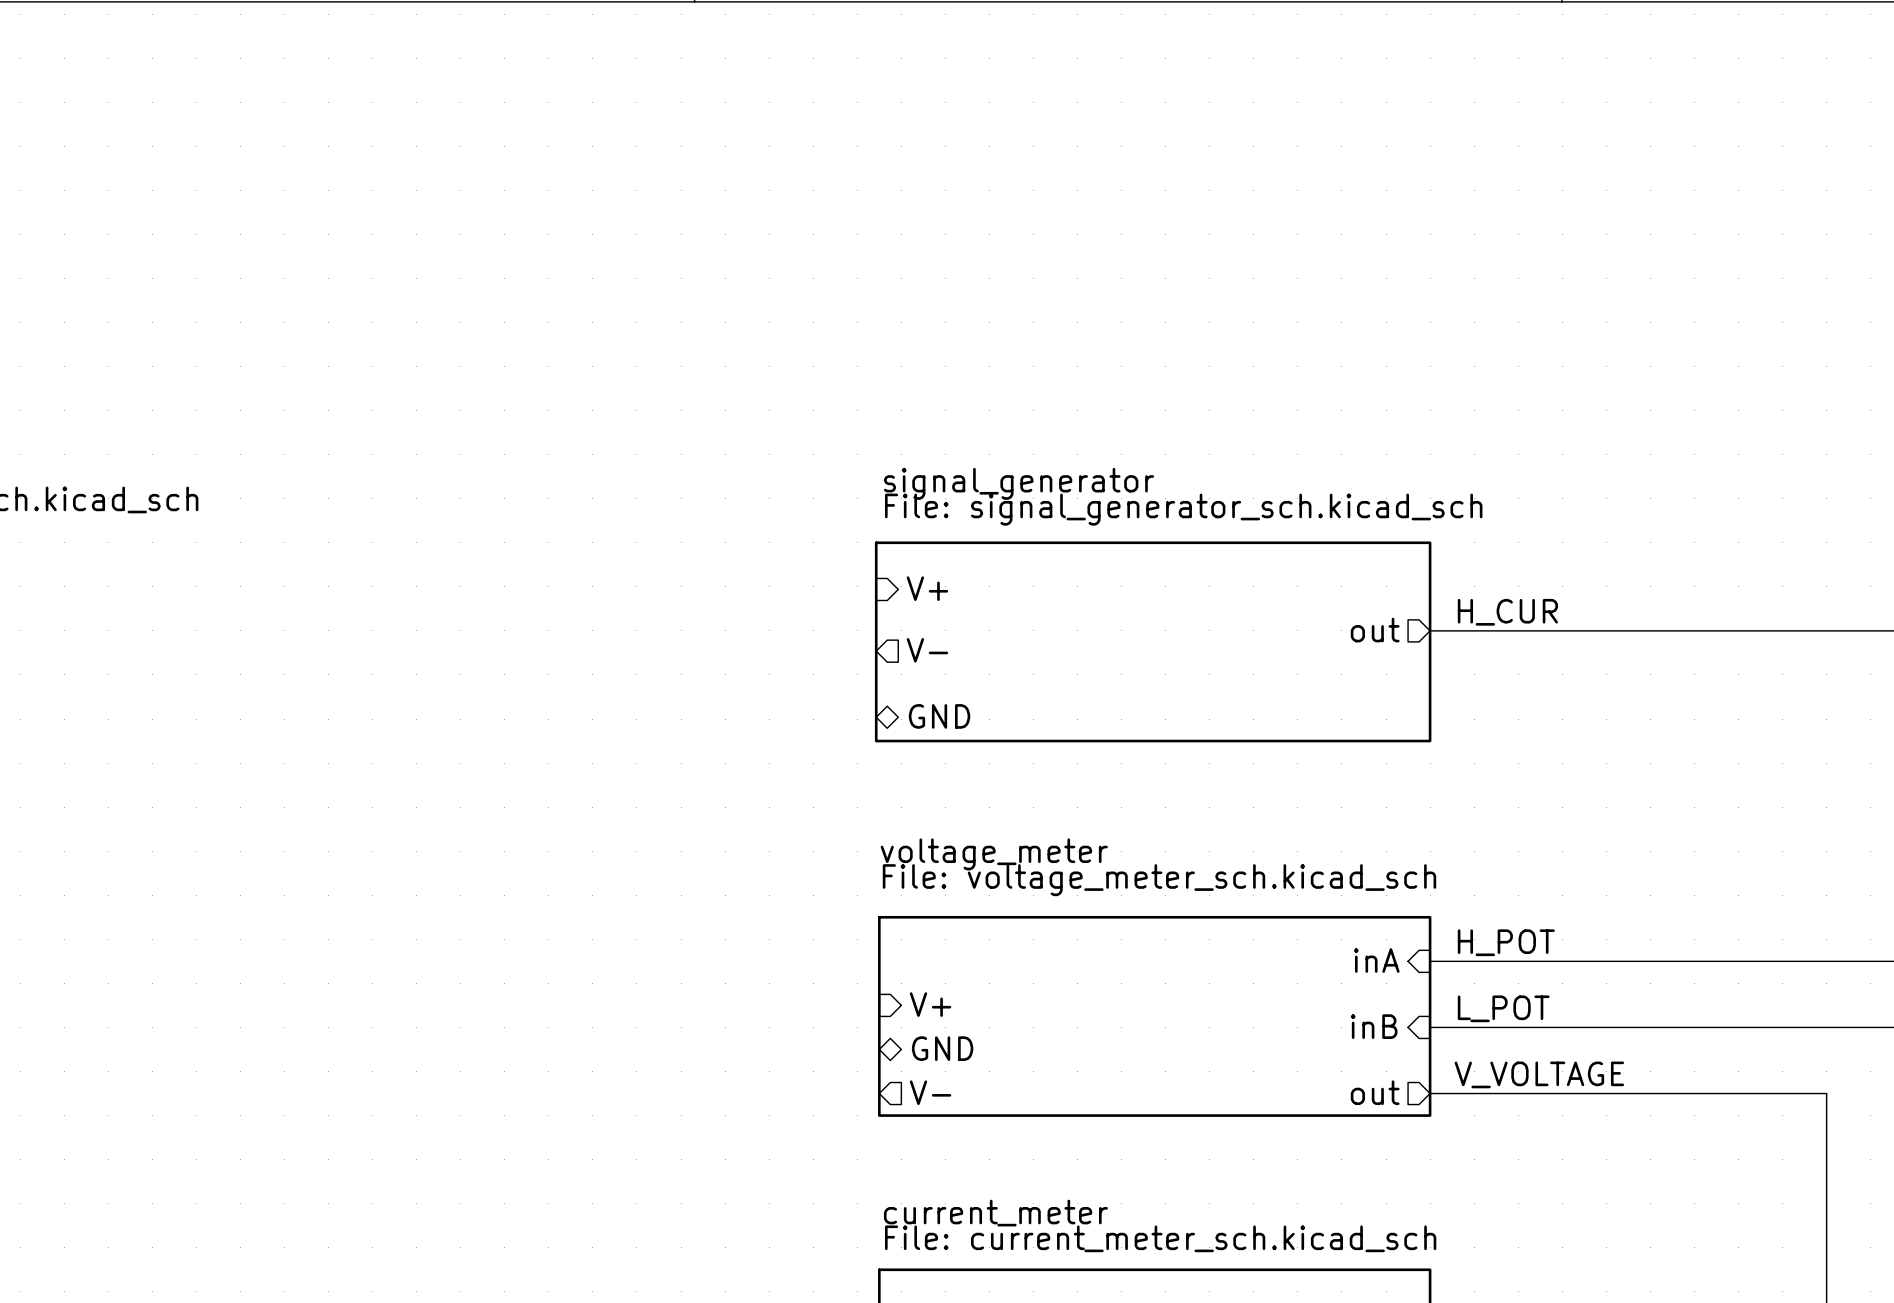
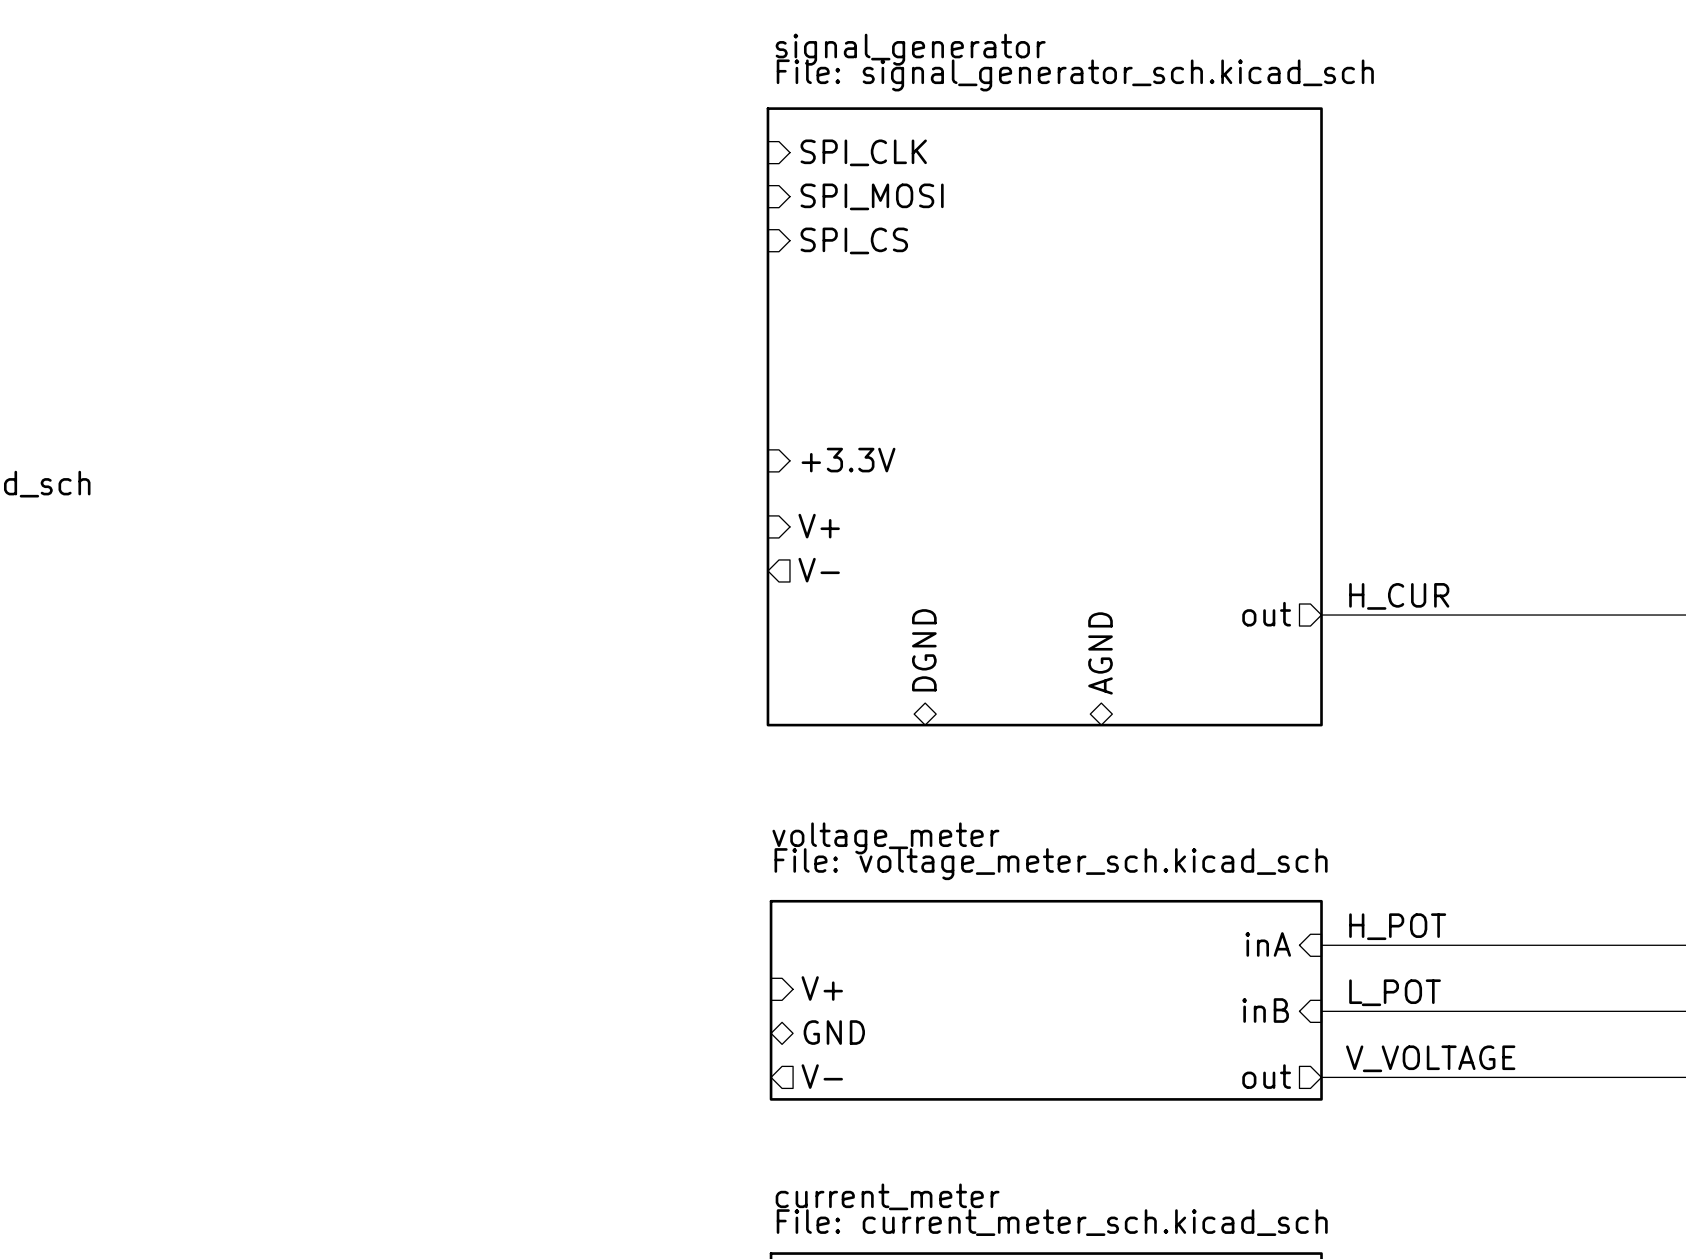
sheet pin: none -> SPI_CLK (863, 152)
sheet pin: none -> SPI_MOSI (872, 196)
sheet pin: none -> SPI_CS (854, 240)
sheet signal_generator: none -> File: signal_generator_sch.kicad_sch (1044, 416)
sheet pin: none -> +3.3V (848, 460)
sheet pin position: V+ (927, 588) -> V+ (819, 526)
sheet signal_generator: File: signal_generator_sch.kicad_sch (1153, 641) -> none
sheet pin position: V- (927, 650) -> V- (819, 570)
sheet pin: none -> DGND (924, 650)
sheet pin: none -> AGND (1100, 653)
sheet pin: GND (939, 716) -> none

